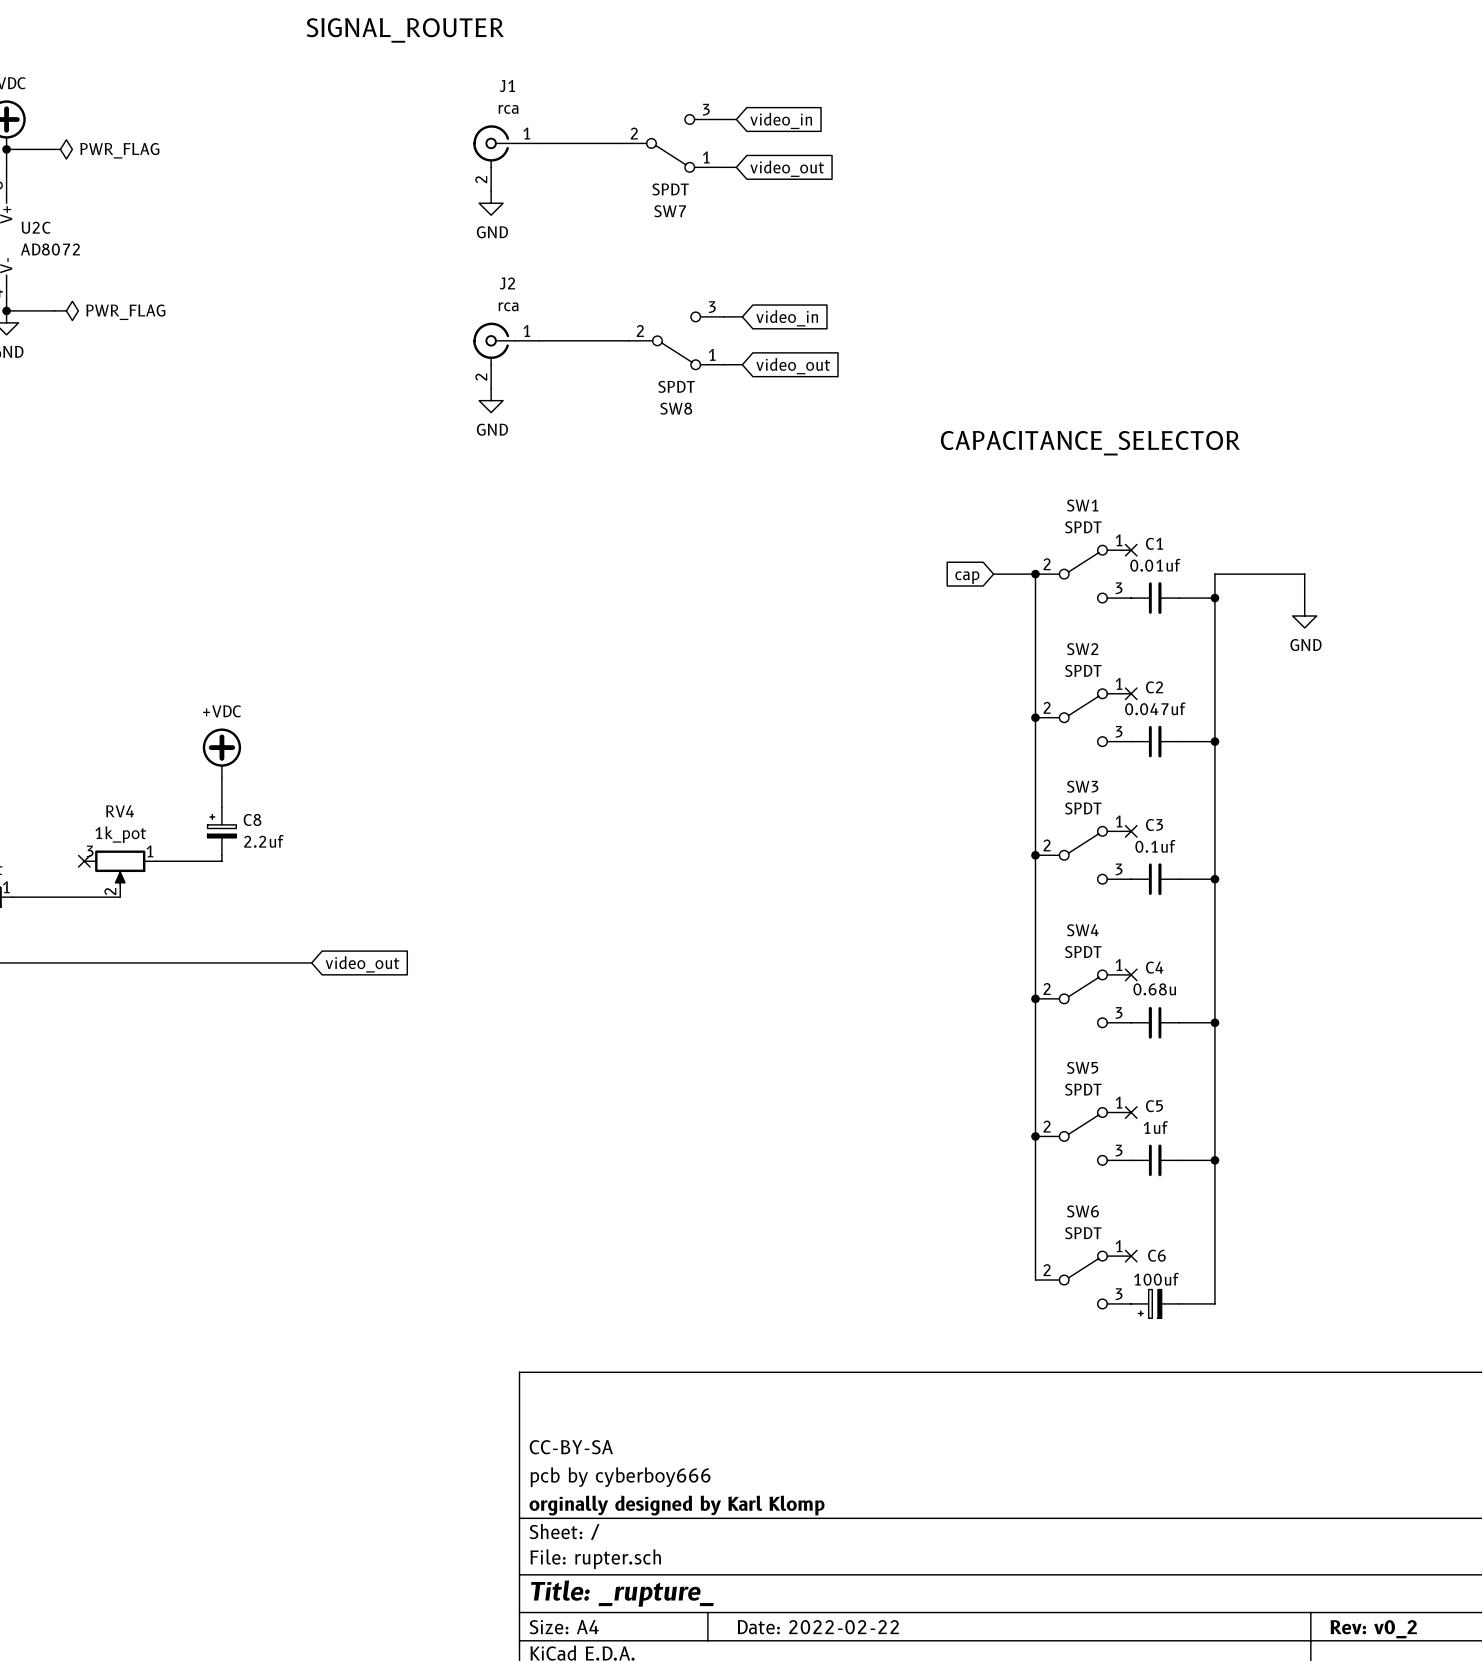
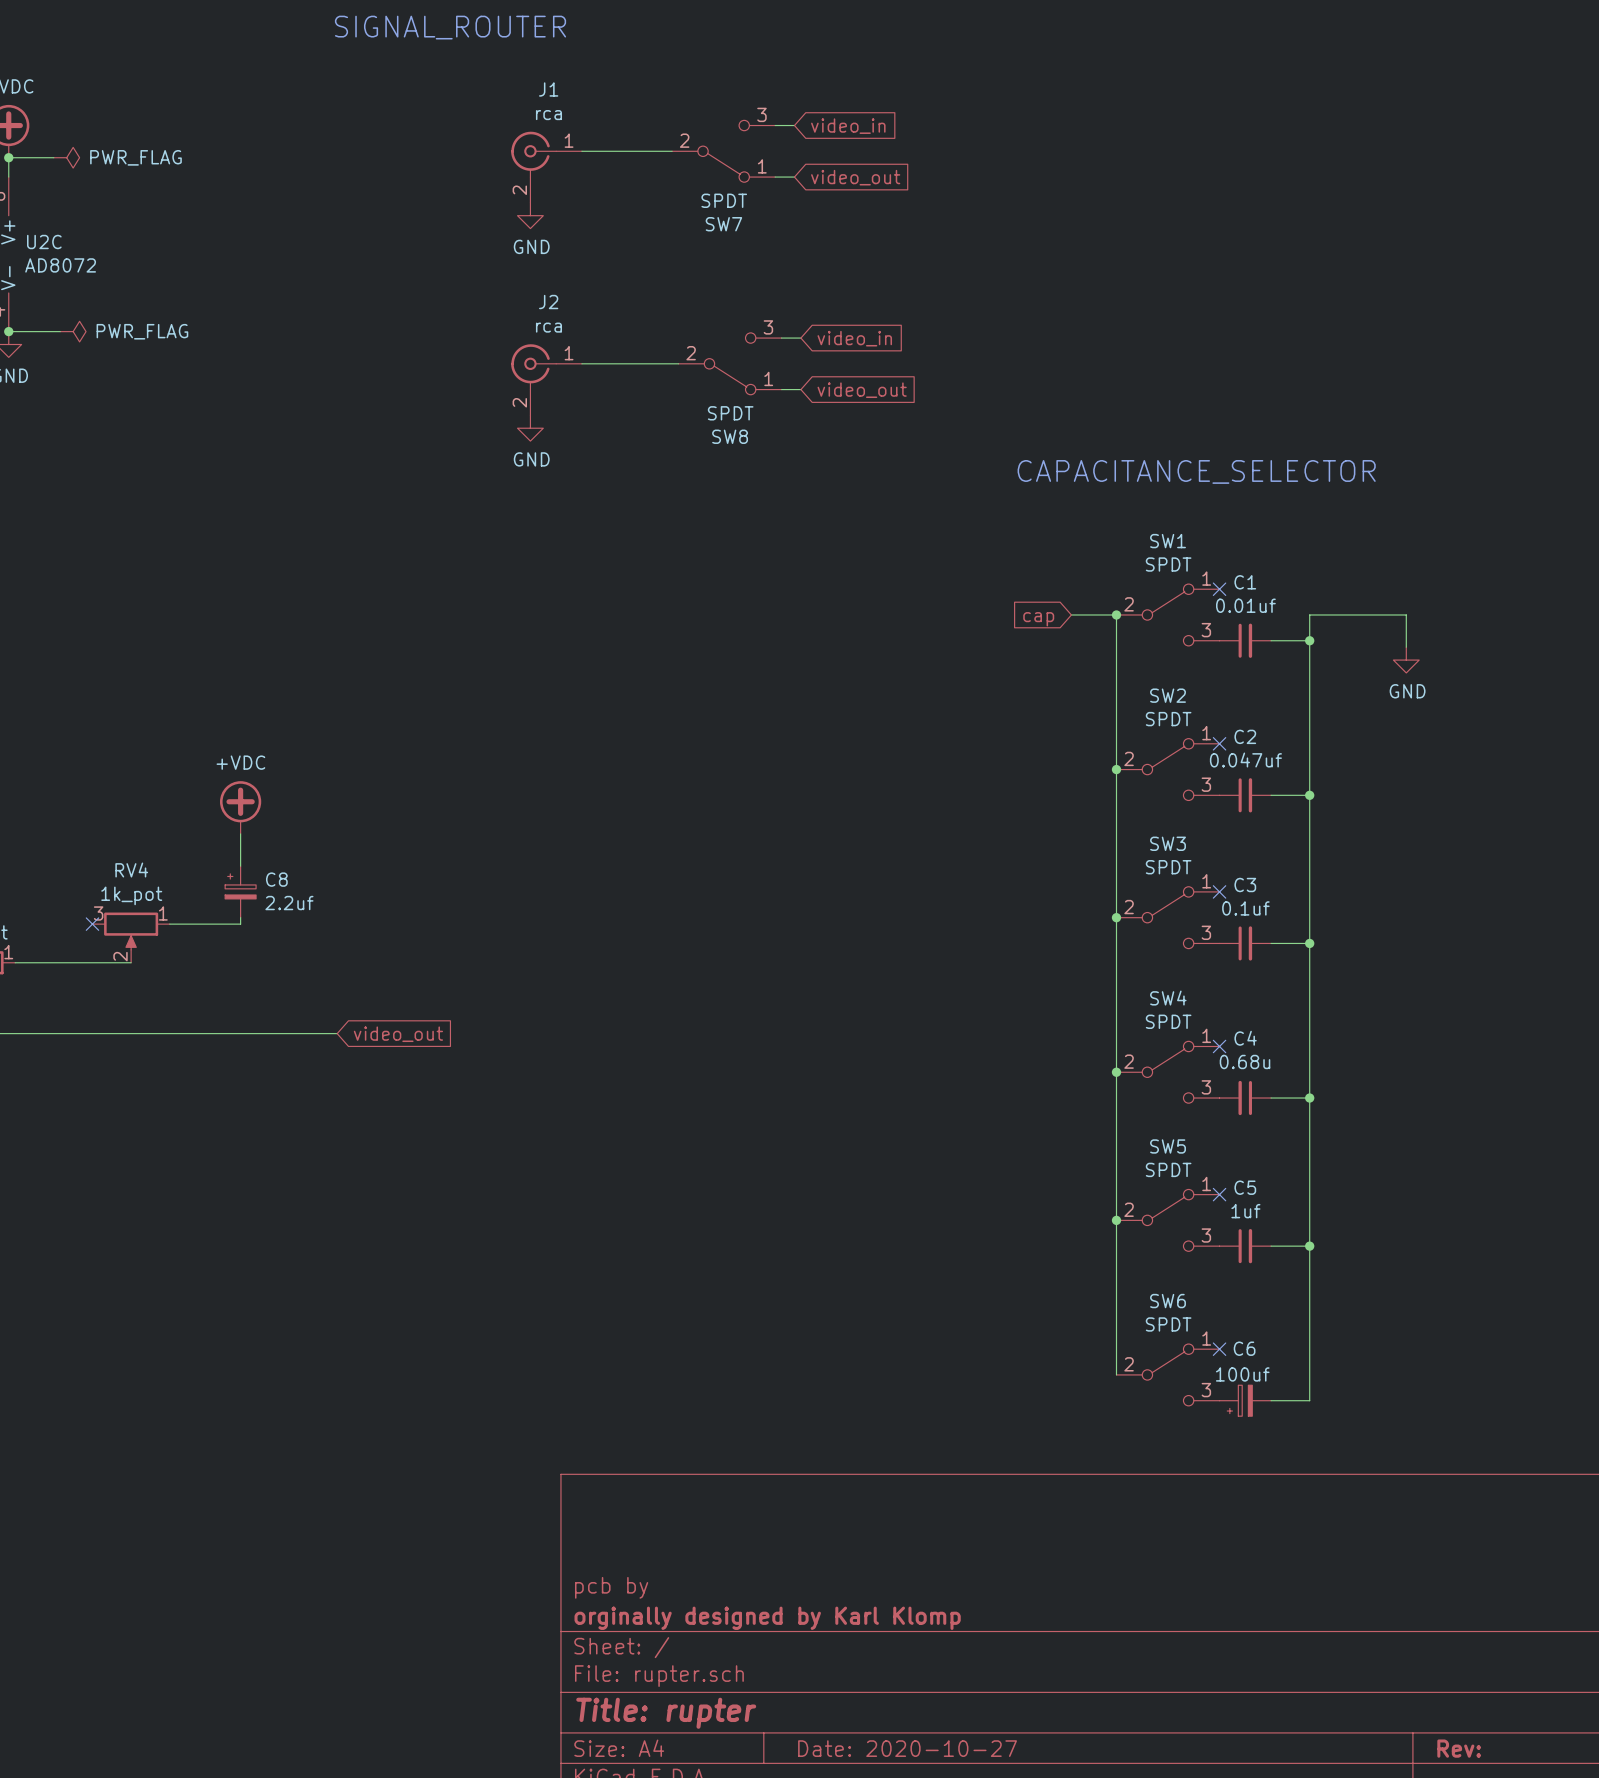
title block: CC-BY-SA (571, 1447) -> none
title block: pcb by cyberboy666 (620, 1477) -> pcb by (611, 1587)
title block: Title: _rupture_ (622, 1593) -> Title: rupter (666, 1713)
title block: Date: 2022-02-22 (818, 1627) -> Date: 2020-10-27 (907, 1748)
title block: Rev: v0_2 (1373, 1629) -> Rev: (1459, 1748)

